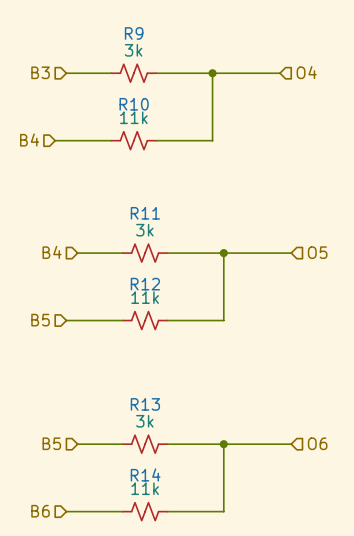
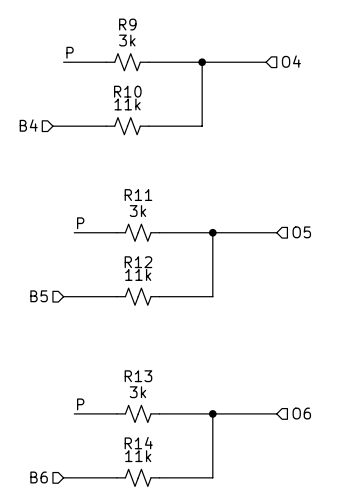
label: none -> P (70, 52)
hierarchical label: B3 (40, 72) -> none
label: none -> P (80, 223)
hierarchical label: B4 (52, 252) -> none
label: none -> P (80, 404)
hierarchical label: B5 (51, 443) -> none

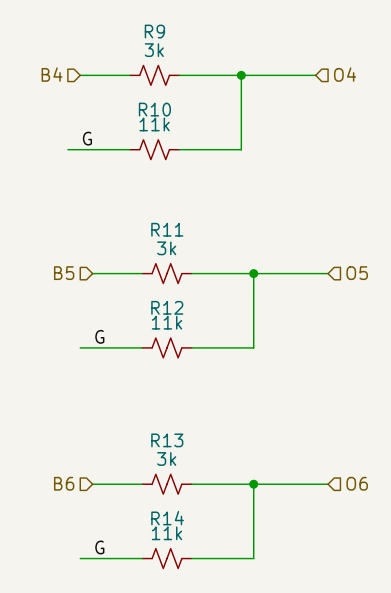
label: P (70, 52) -> none
label: none -> G (87, 138)
hierarchical label position: B4 (28, 125) -> B4 (52, 74)
label: P (80, 223) -> none
label: none -> G (99, 336)
hierarchical label position: B5 (39, 296) -> B5 (64, 273)
label: P (80, 404) -> none
label: none -> G (99, 547)
hierarchical label position: B6 (39, 477) -> B6 (64, 483)

